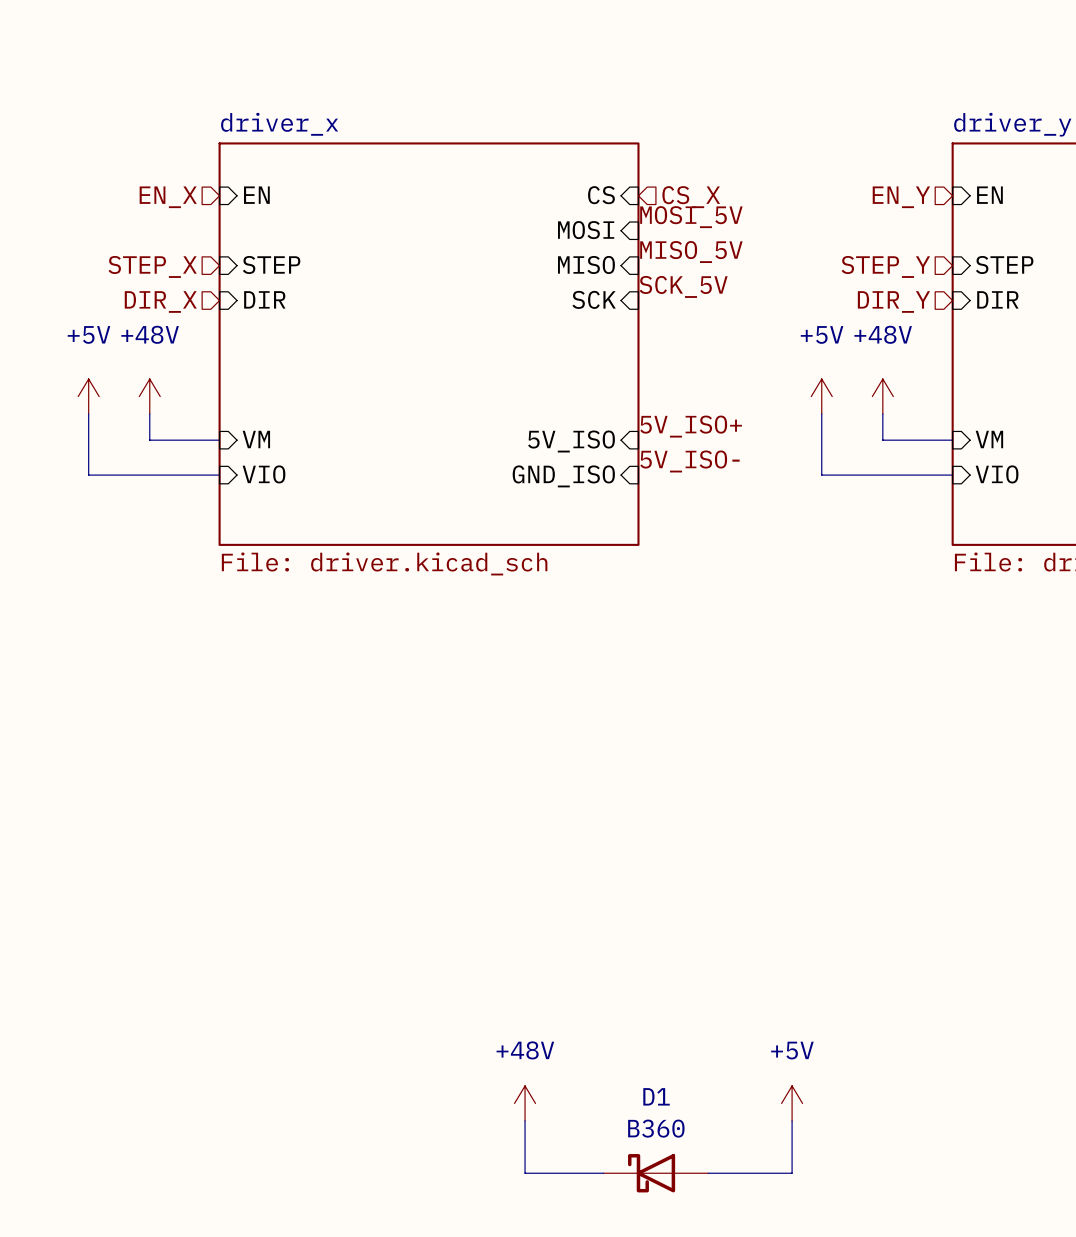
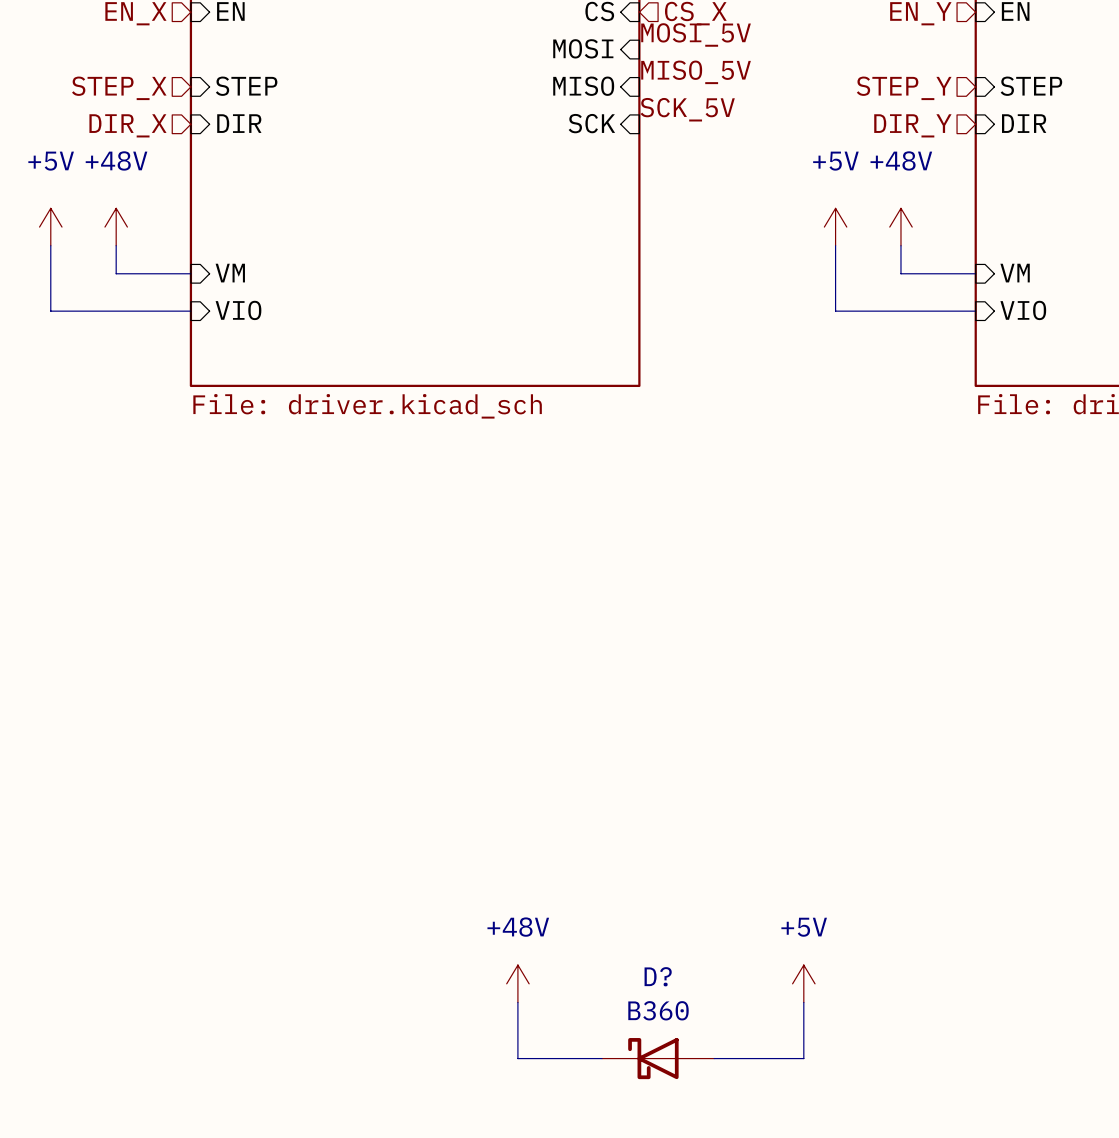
label: 5V_ISO+ (691, 426) -> none
sheet pin: 5V_ISO (571, 441) -> none
label: 5V_ISO- (689, 461) -> none
sheet pin: GND_ISO (563, 476) -> none
D1 name: D1 (656, 1096) -> D? (658, 976)

